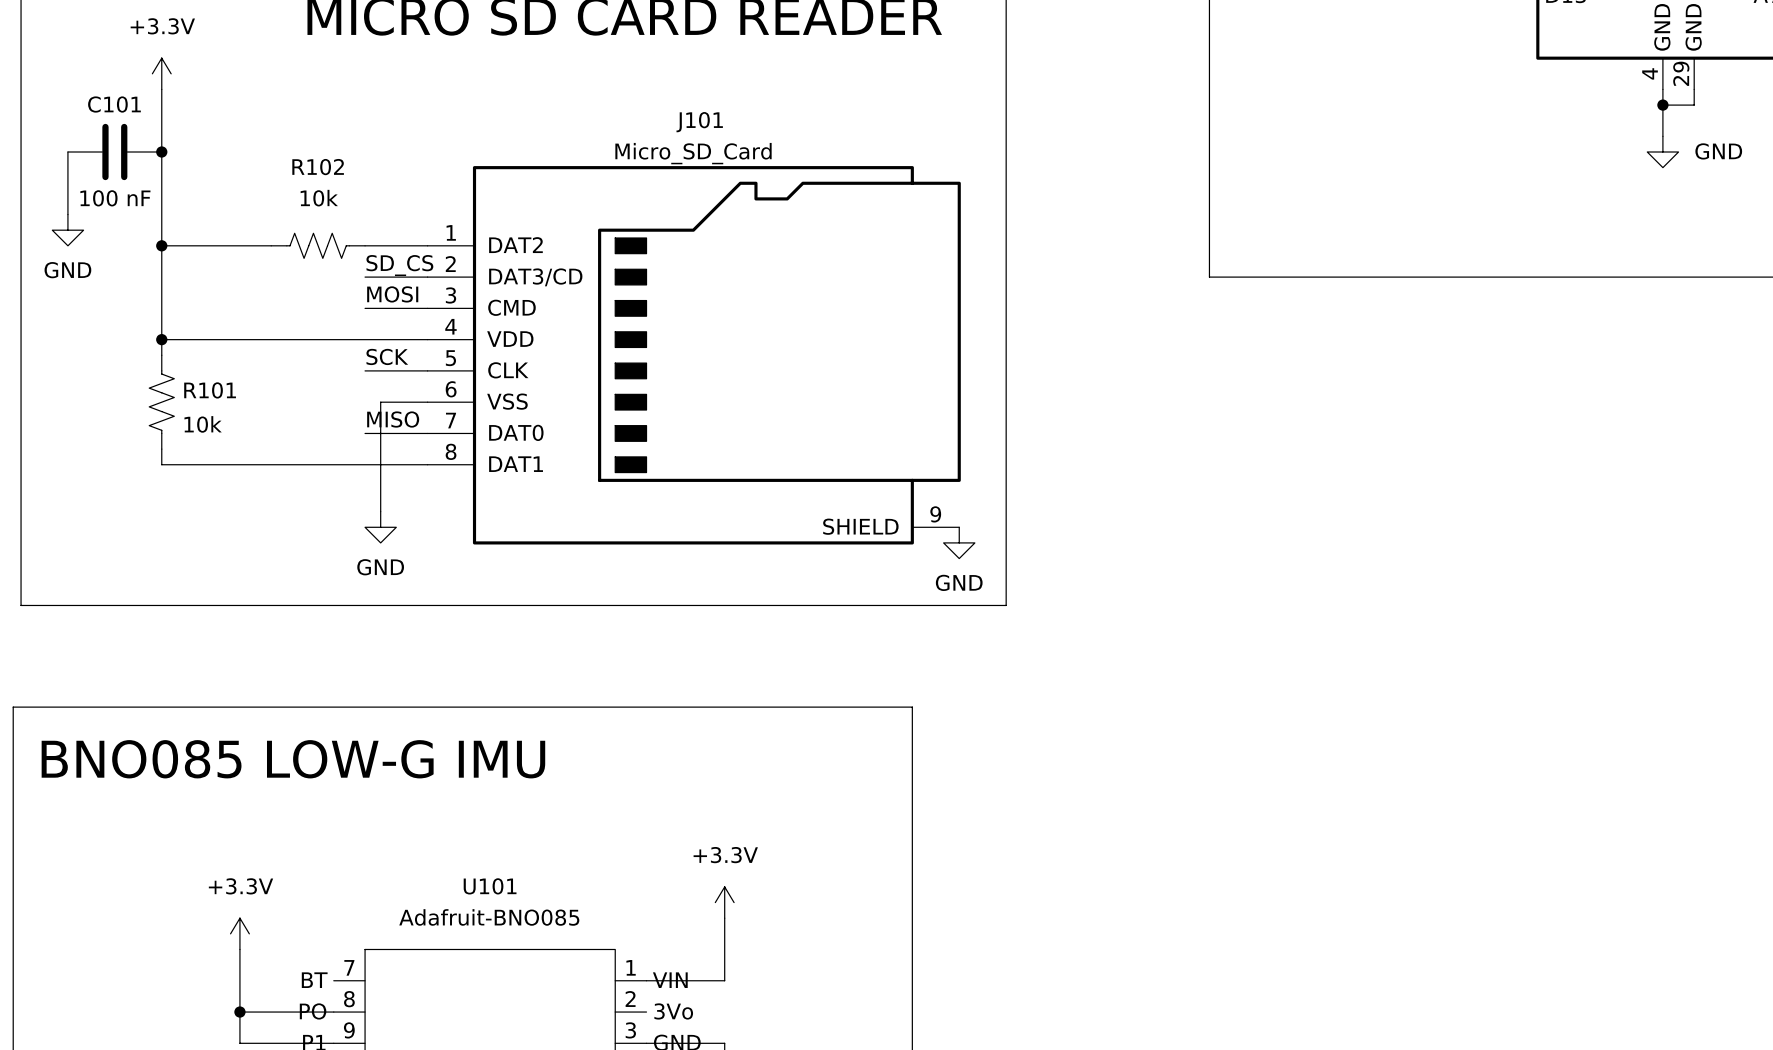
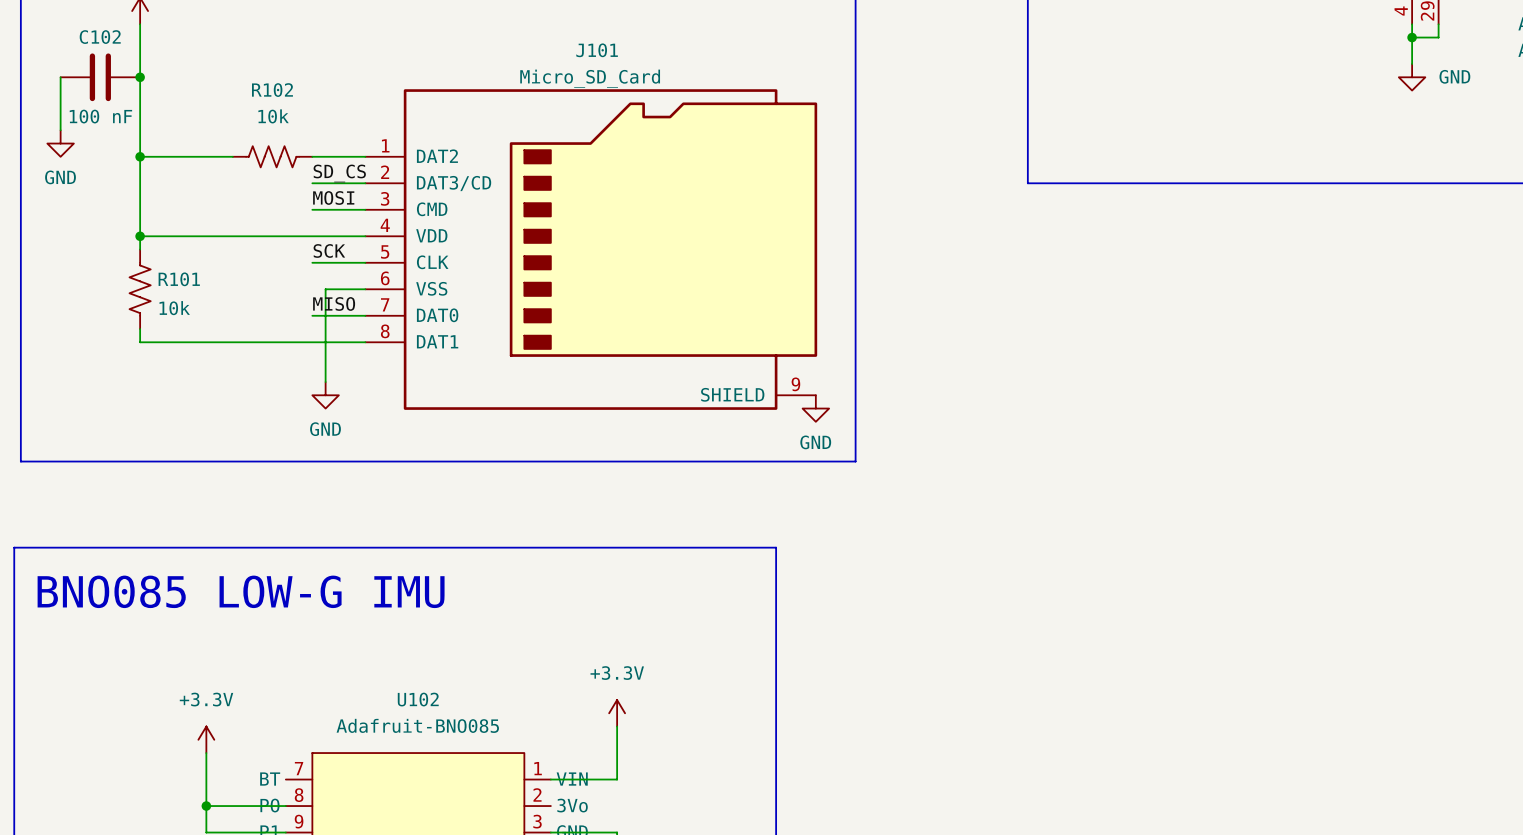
C101 name: C101 (114, 104) -> C102 (100, 37)
U101 name: U101 (490, 886) -> U102 (418, 699)

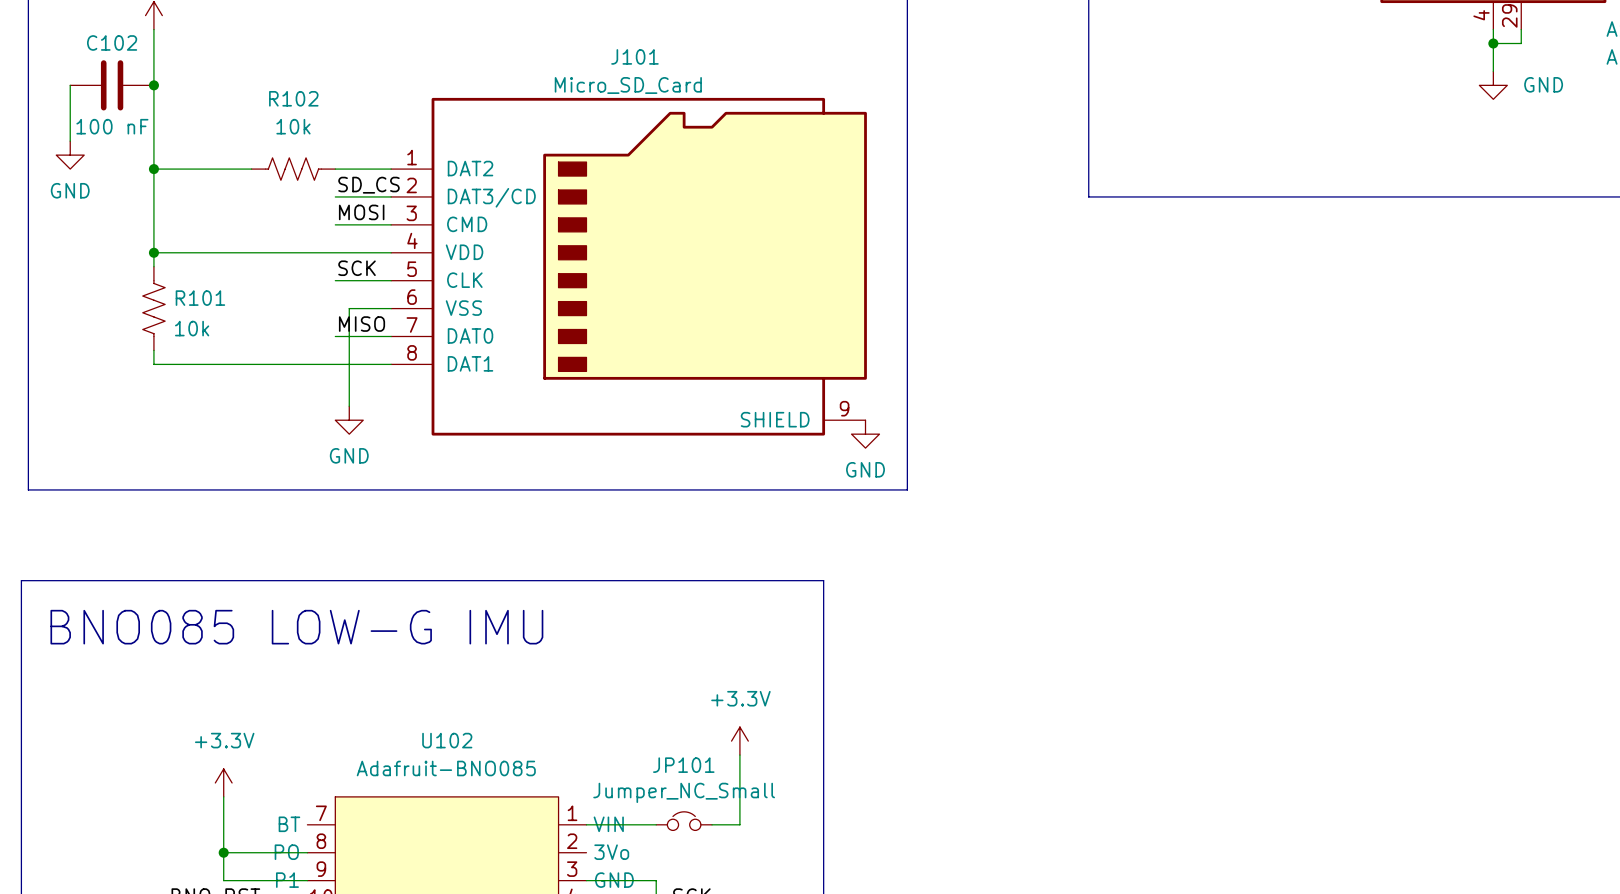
power symbol position: +3.3V (617, 713) -> +3.3V (739, 741)
wire: none -> (739, 755) (739, 824) (712, 824)
wire: (617, 726) (617, 779) -> none
JP101: none -> Jumper_NC_Small (684, 821)

